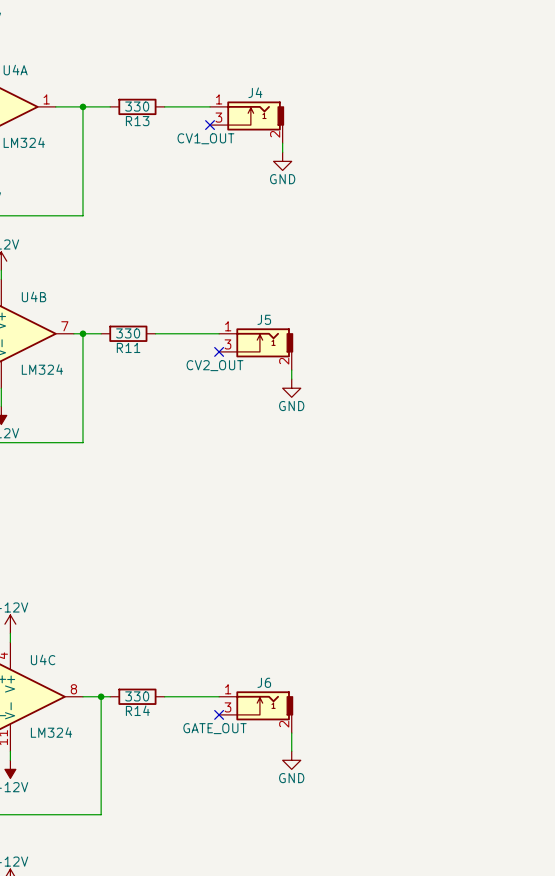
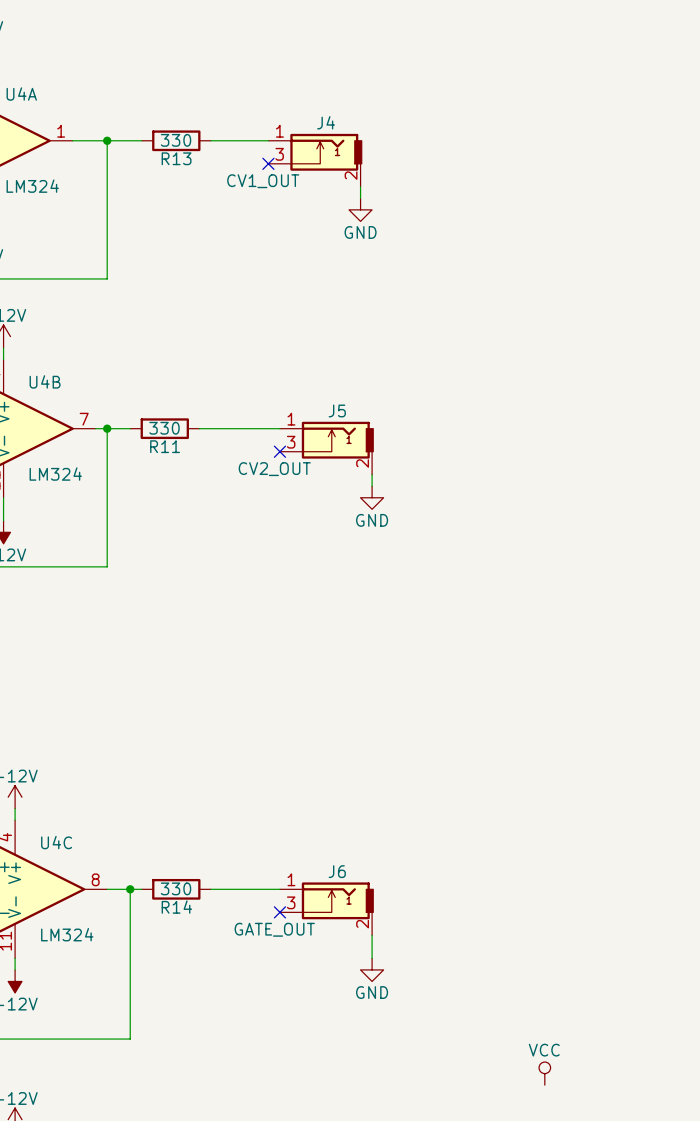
power symbol: none -> VCC (544, 1073)

